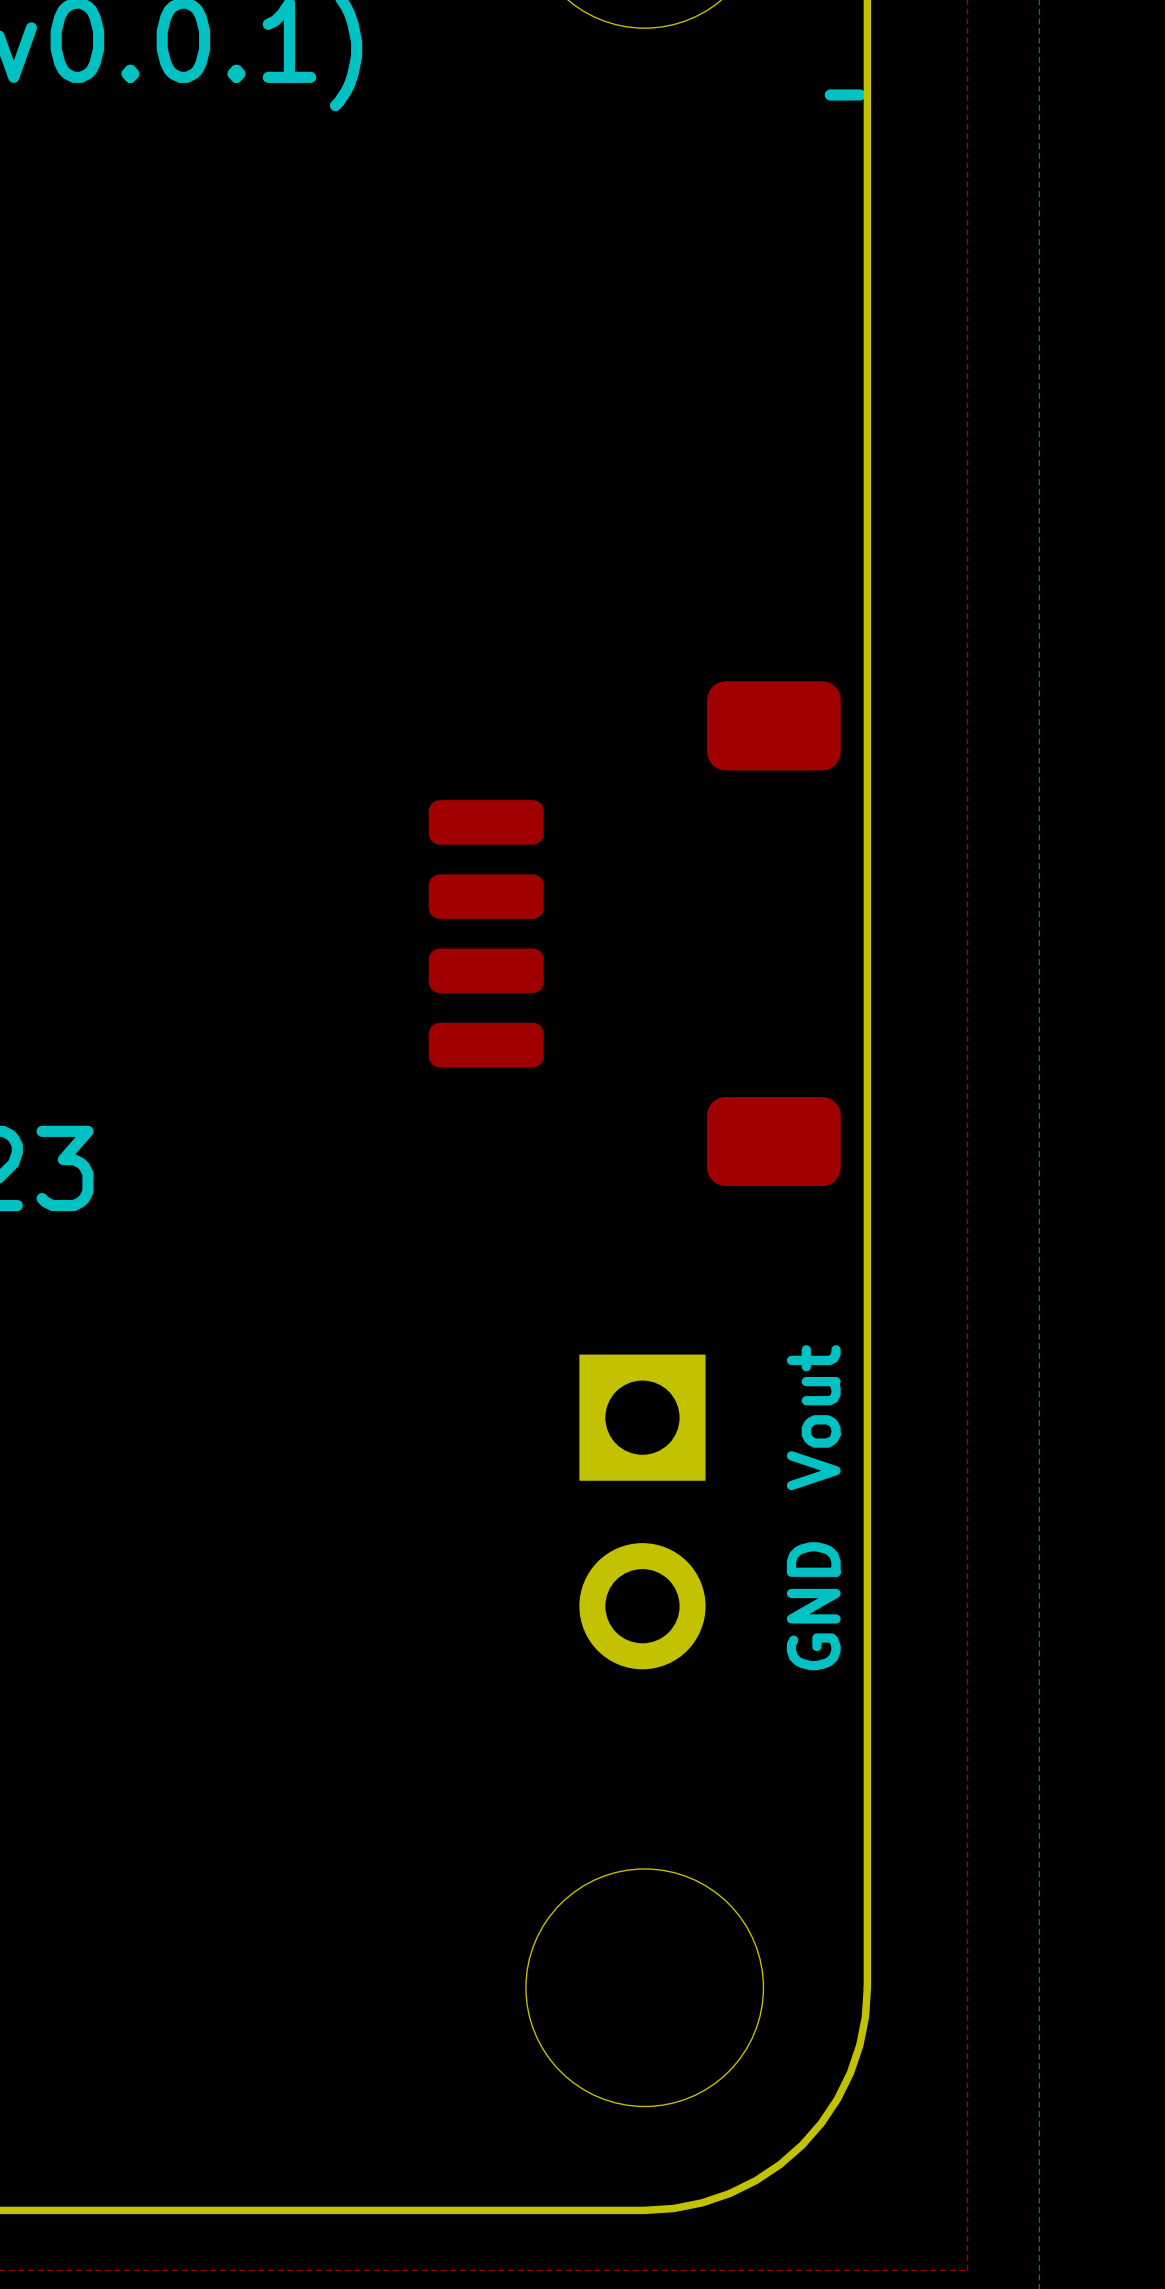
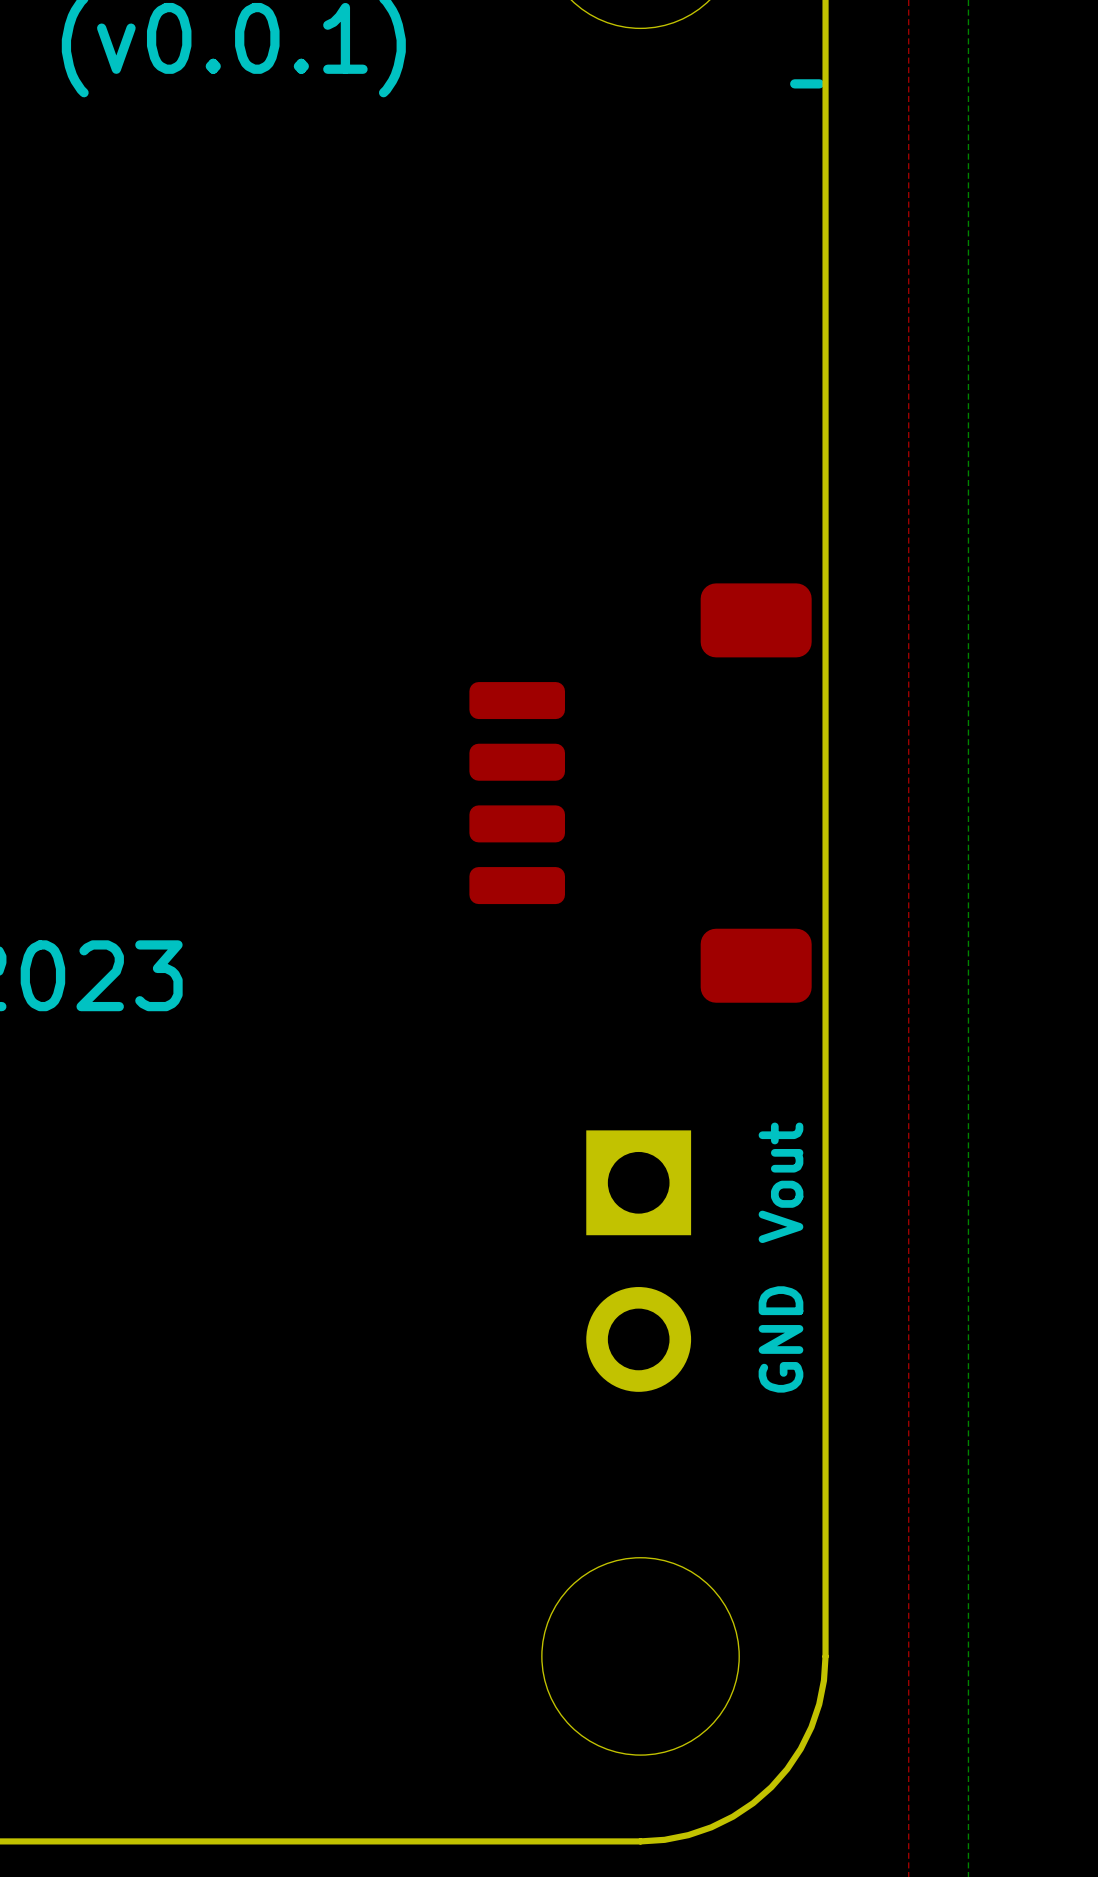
part position: (634, 933) -> (640, 793)

